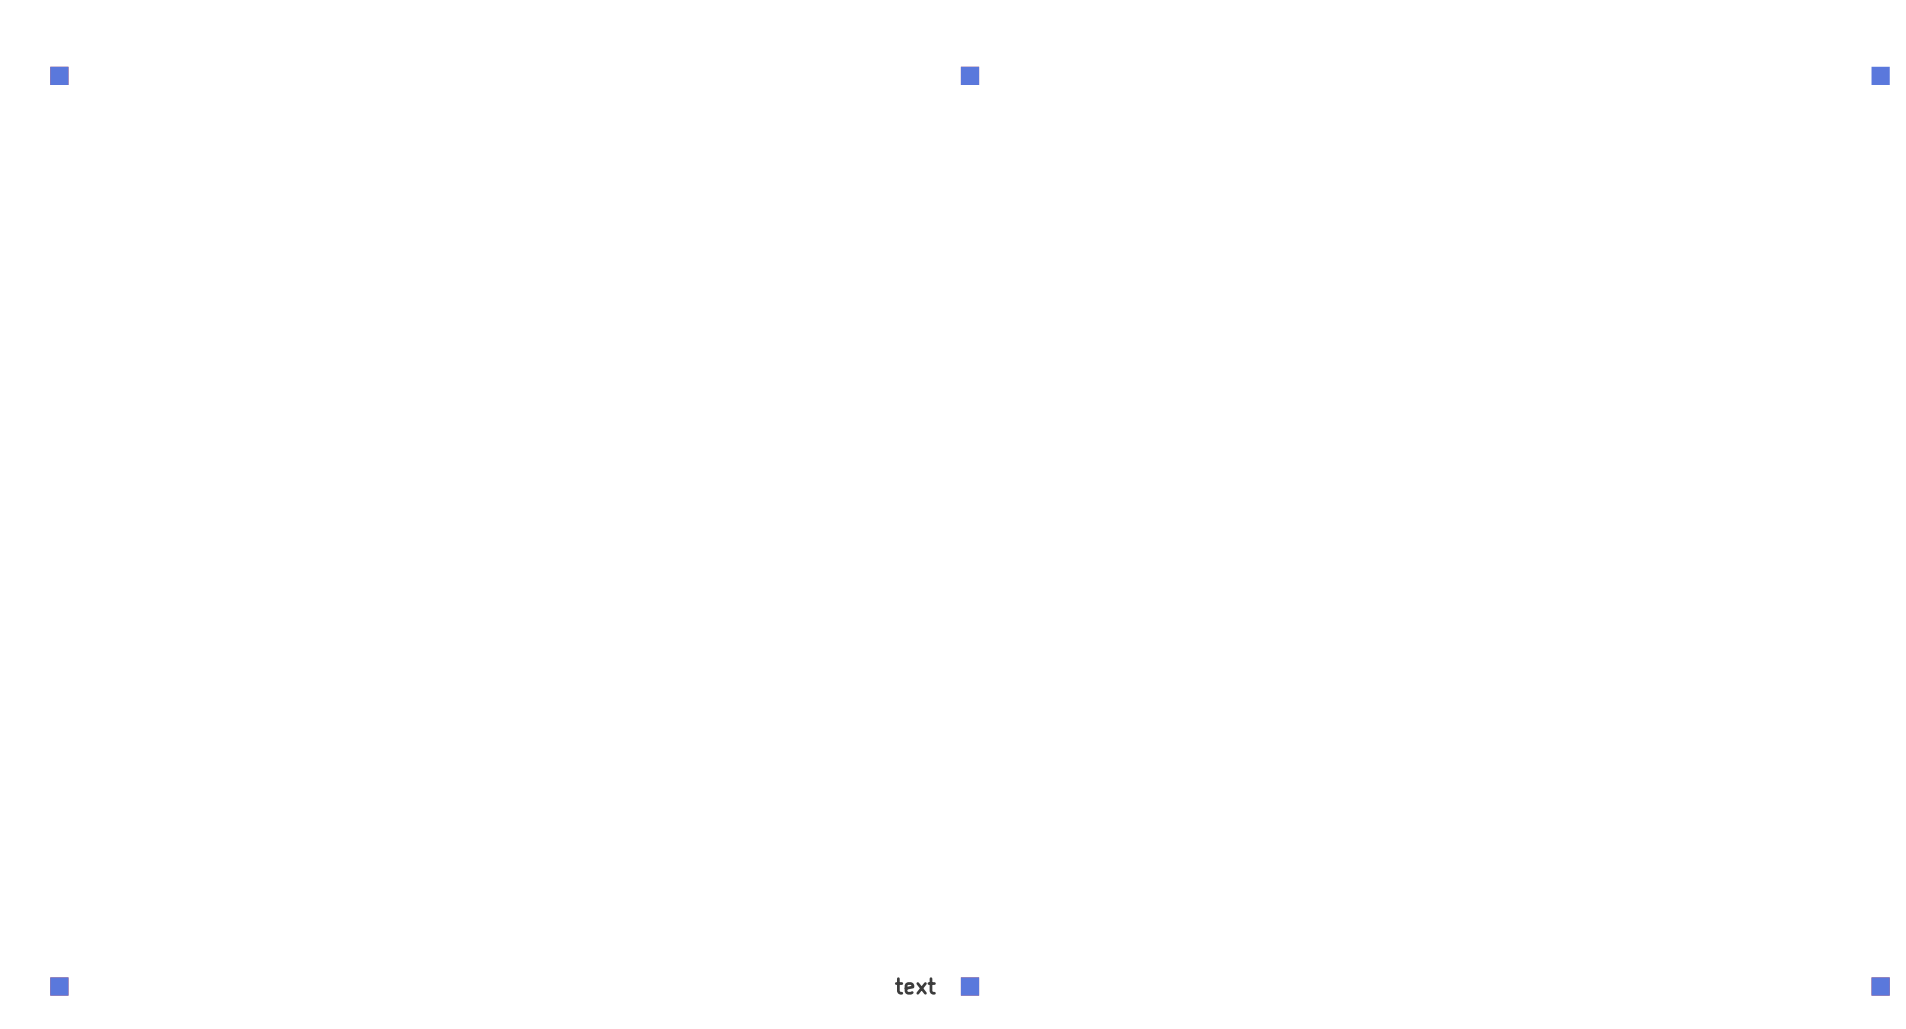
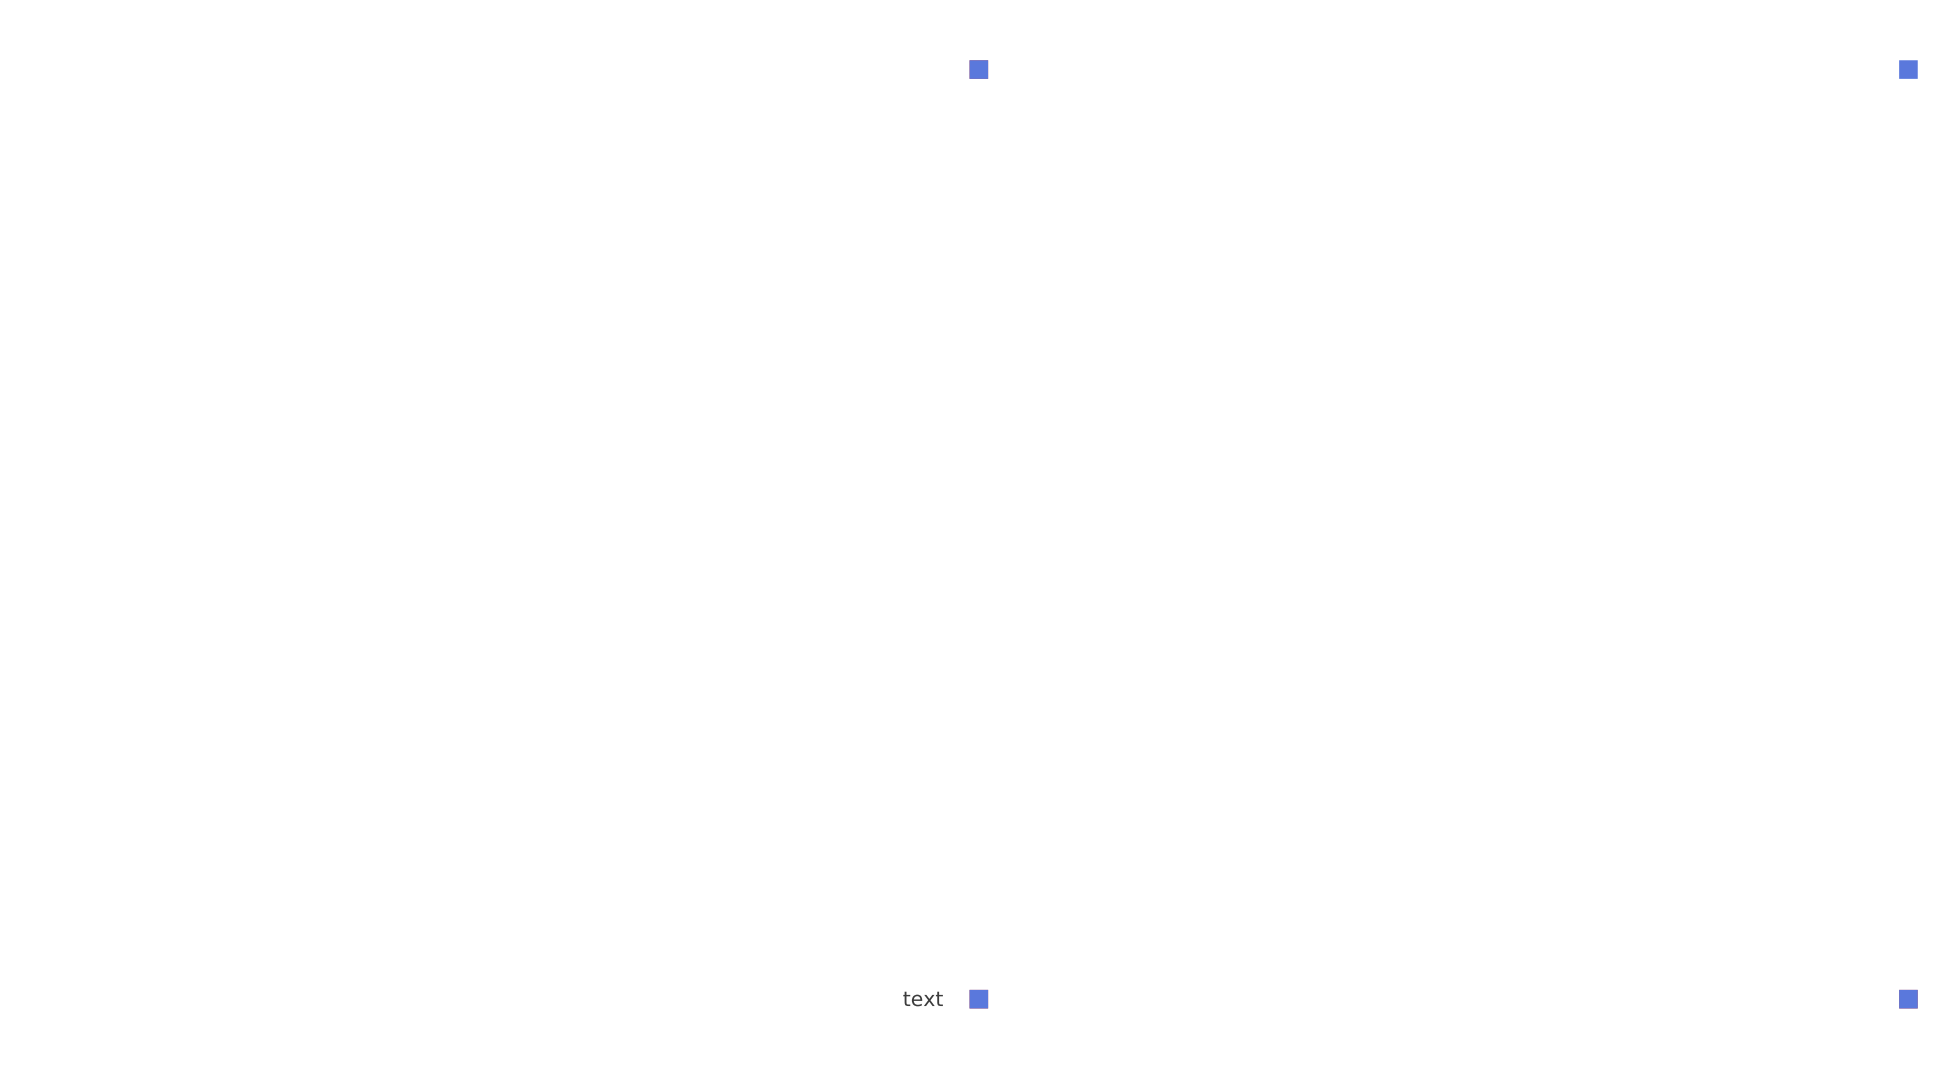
part: (59, 75) -> none
part: (59, 986) -> none

